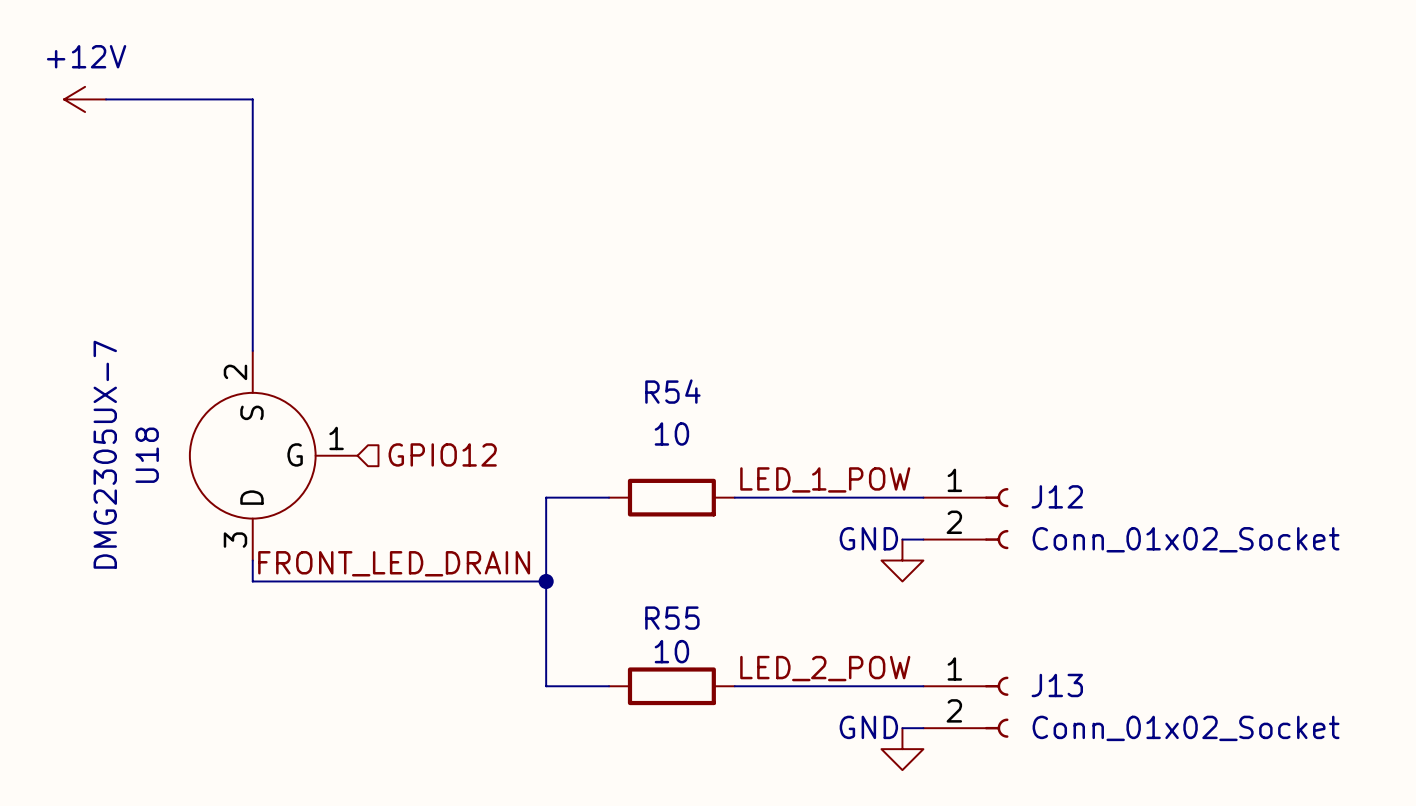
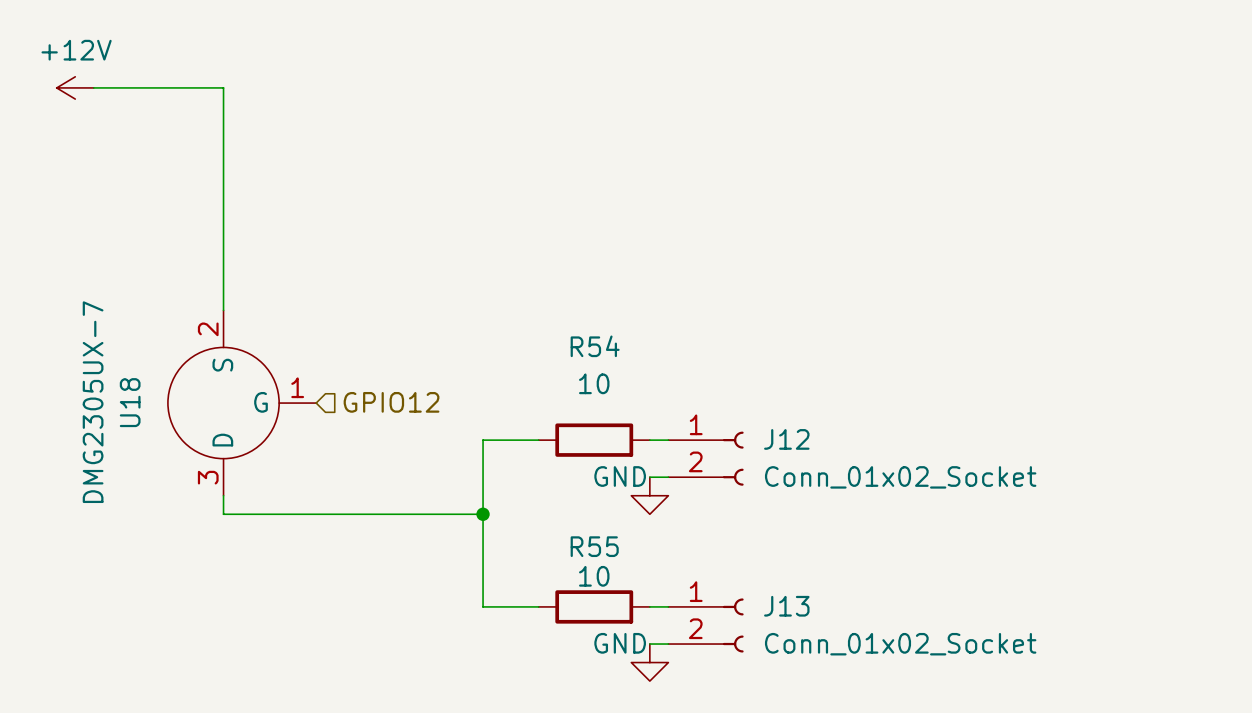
label: LED_1_POW (825, 479) -> none
wire: (755, 497) (923, 497) -> none
J12 position: (965, 518) -> (706, 458)
wire: (902, 539) (923, 539) -> (649, 477) (668, 477)
power symbol: none -> GND (649, 495)
power symbol: GND (902, 560) -> none
label: FRONT_LED_DRAIN (394, 563) -> none
label: LED_2_POW (825, 668) -> none
wire: (755, 686) (923, 686) -> none
J13 position: (965, 707) -> (706, 625)
wire: (902, 728) (923, 728) -> (649, 644) (668, 644)
power symbol: none -> GND (649, 662)
power symbol: GND (902, 749) -> none

